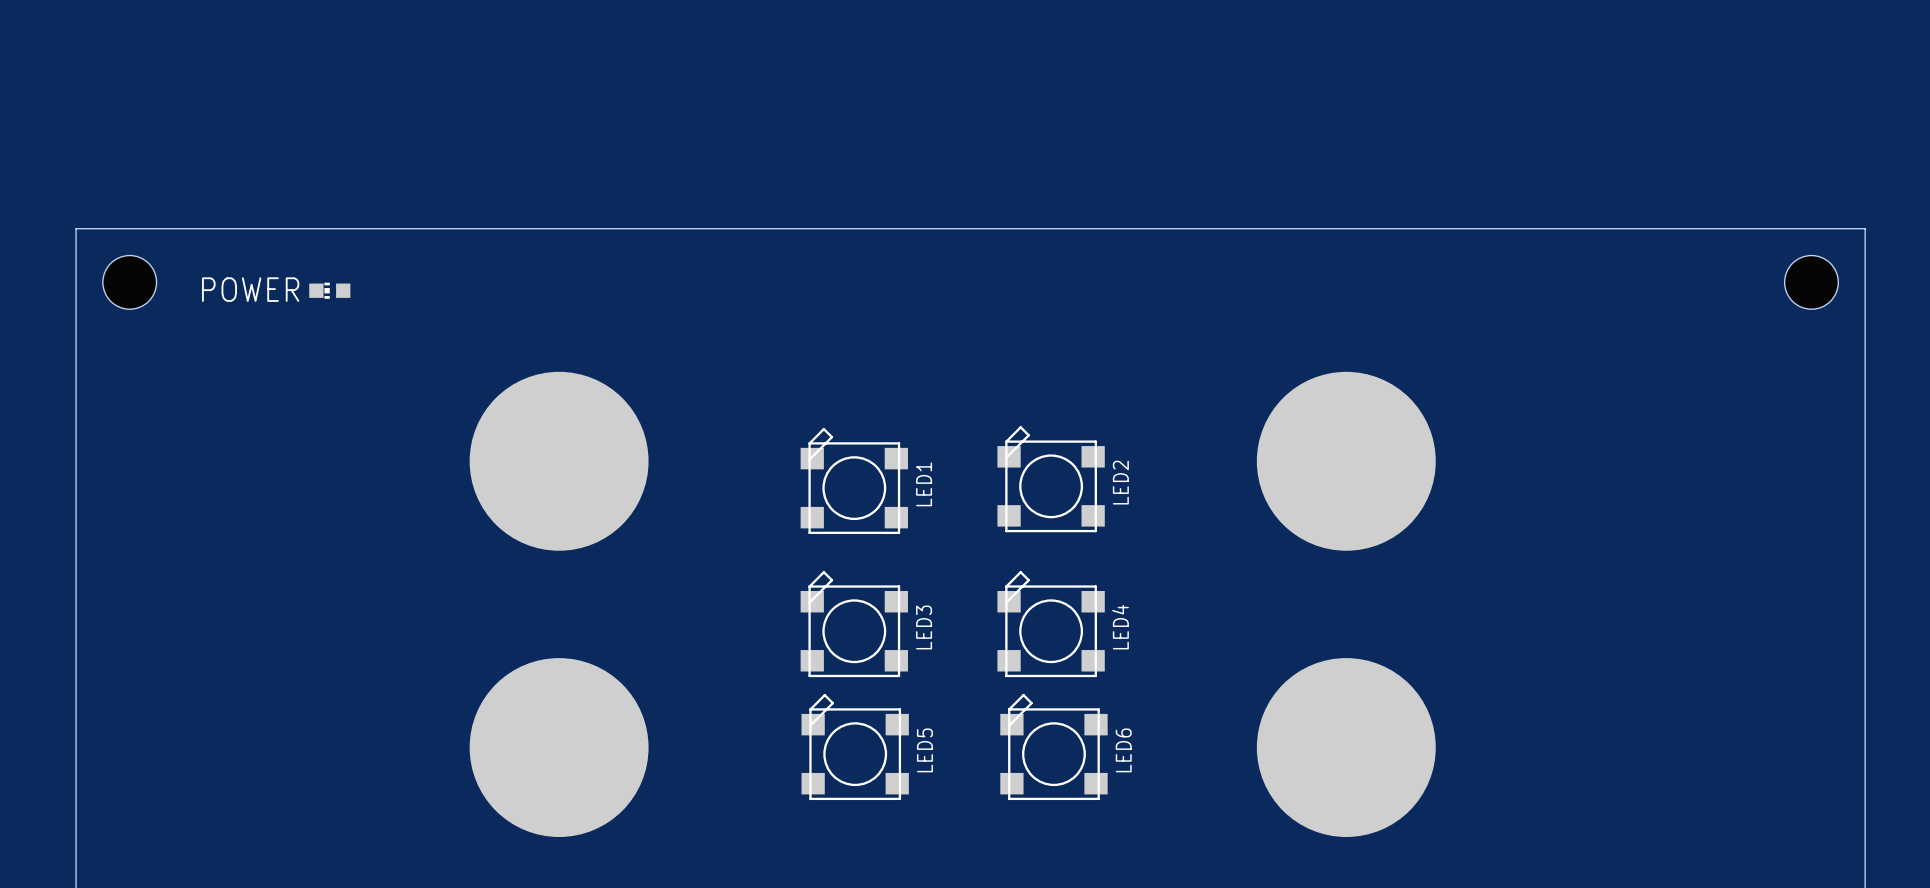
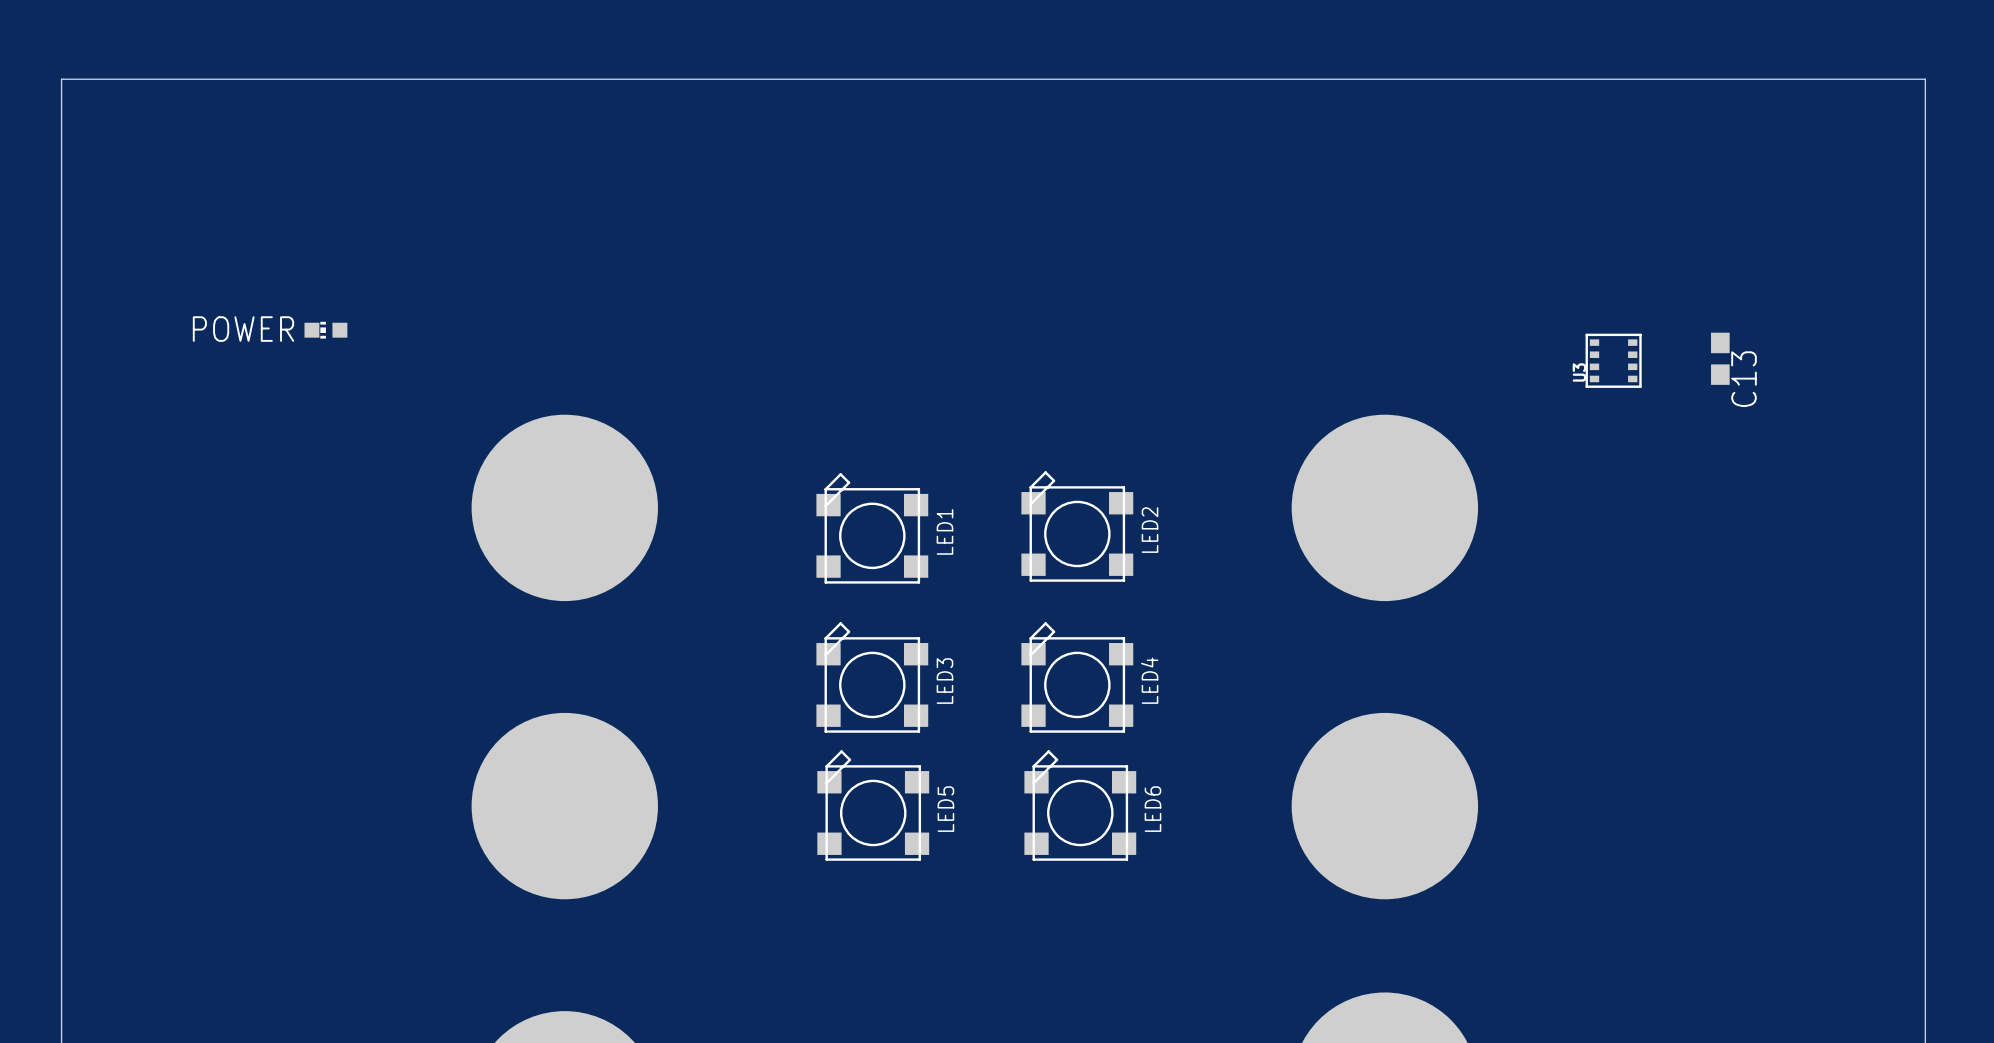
board edge: (76, 228) (1865, 228) -> (61, 265) (61, 79) (1925, 79) (1925, 265)
hole: (129, 282) -> none
hole: (1811, 282) -> none
C13: none -> (1720, 358)
U3: none -> (1613, 360)

